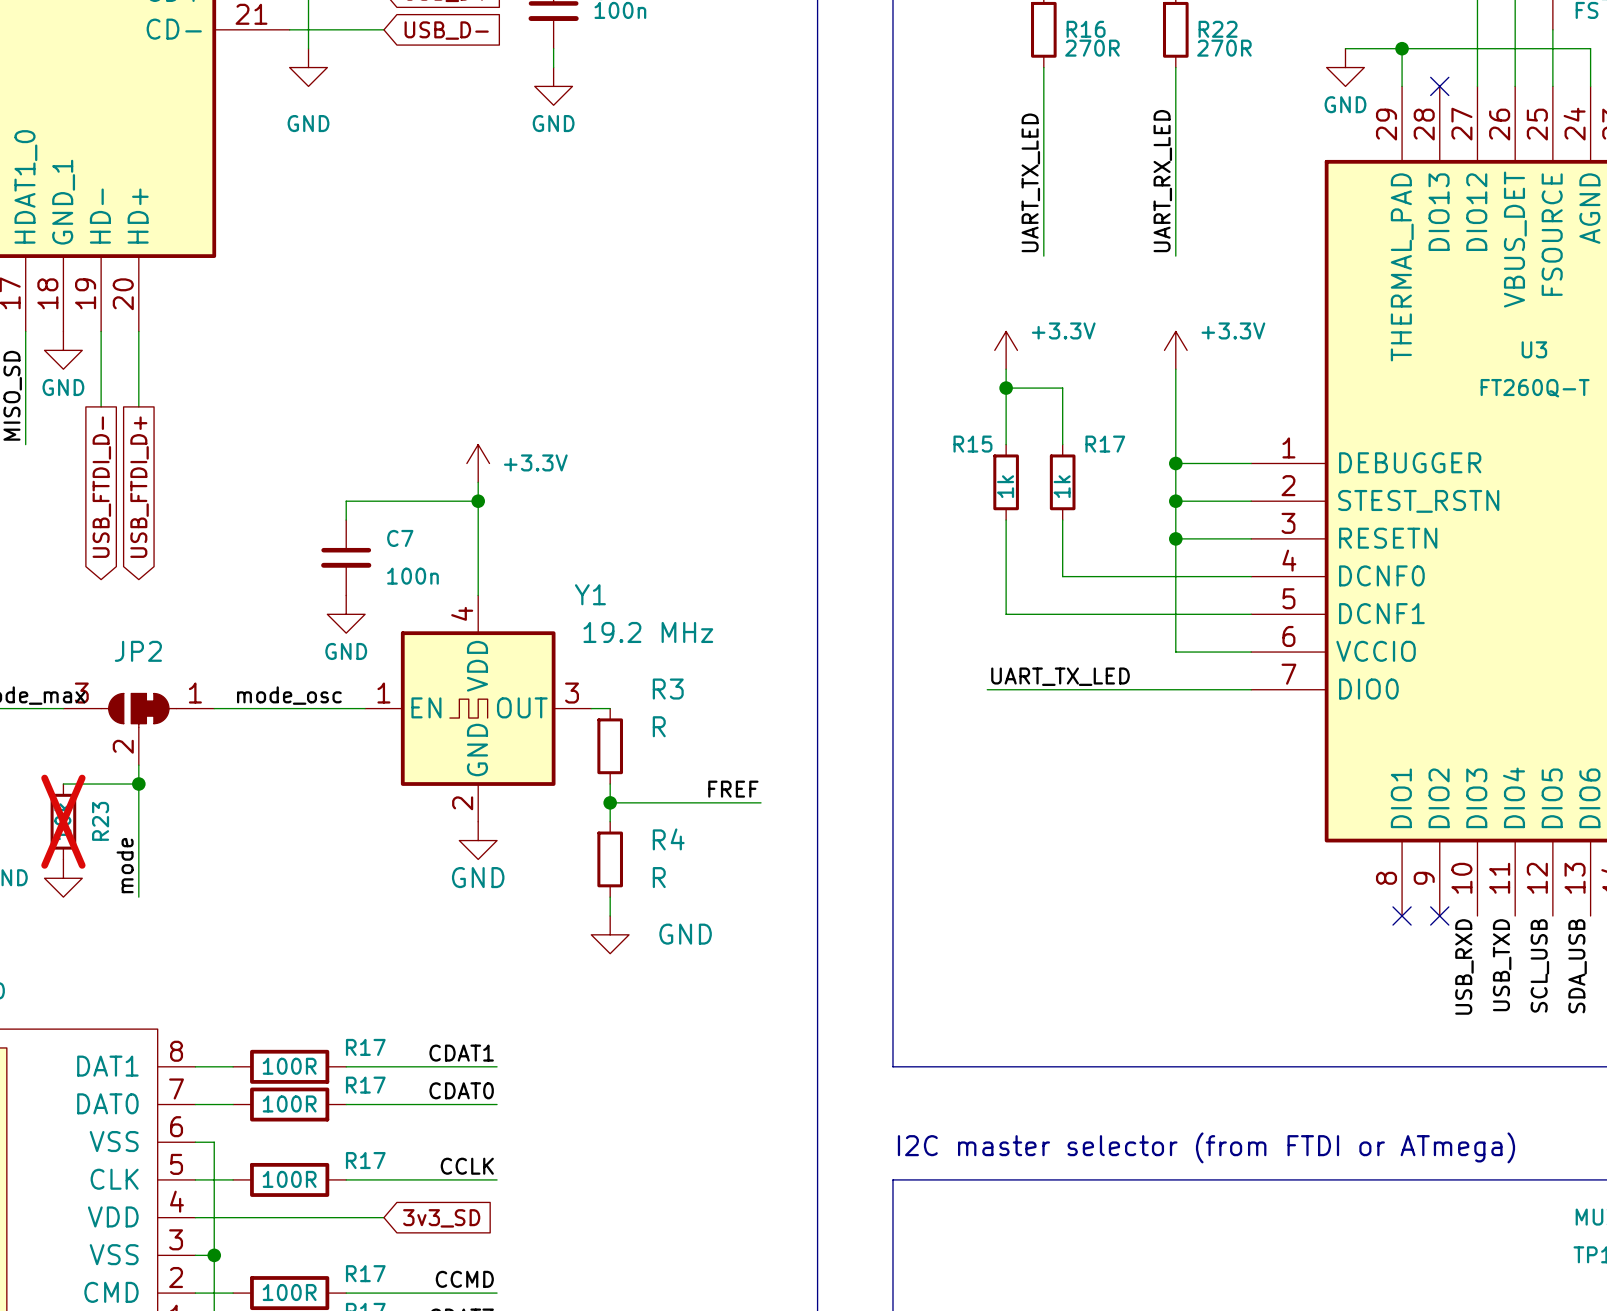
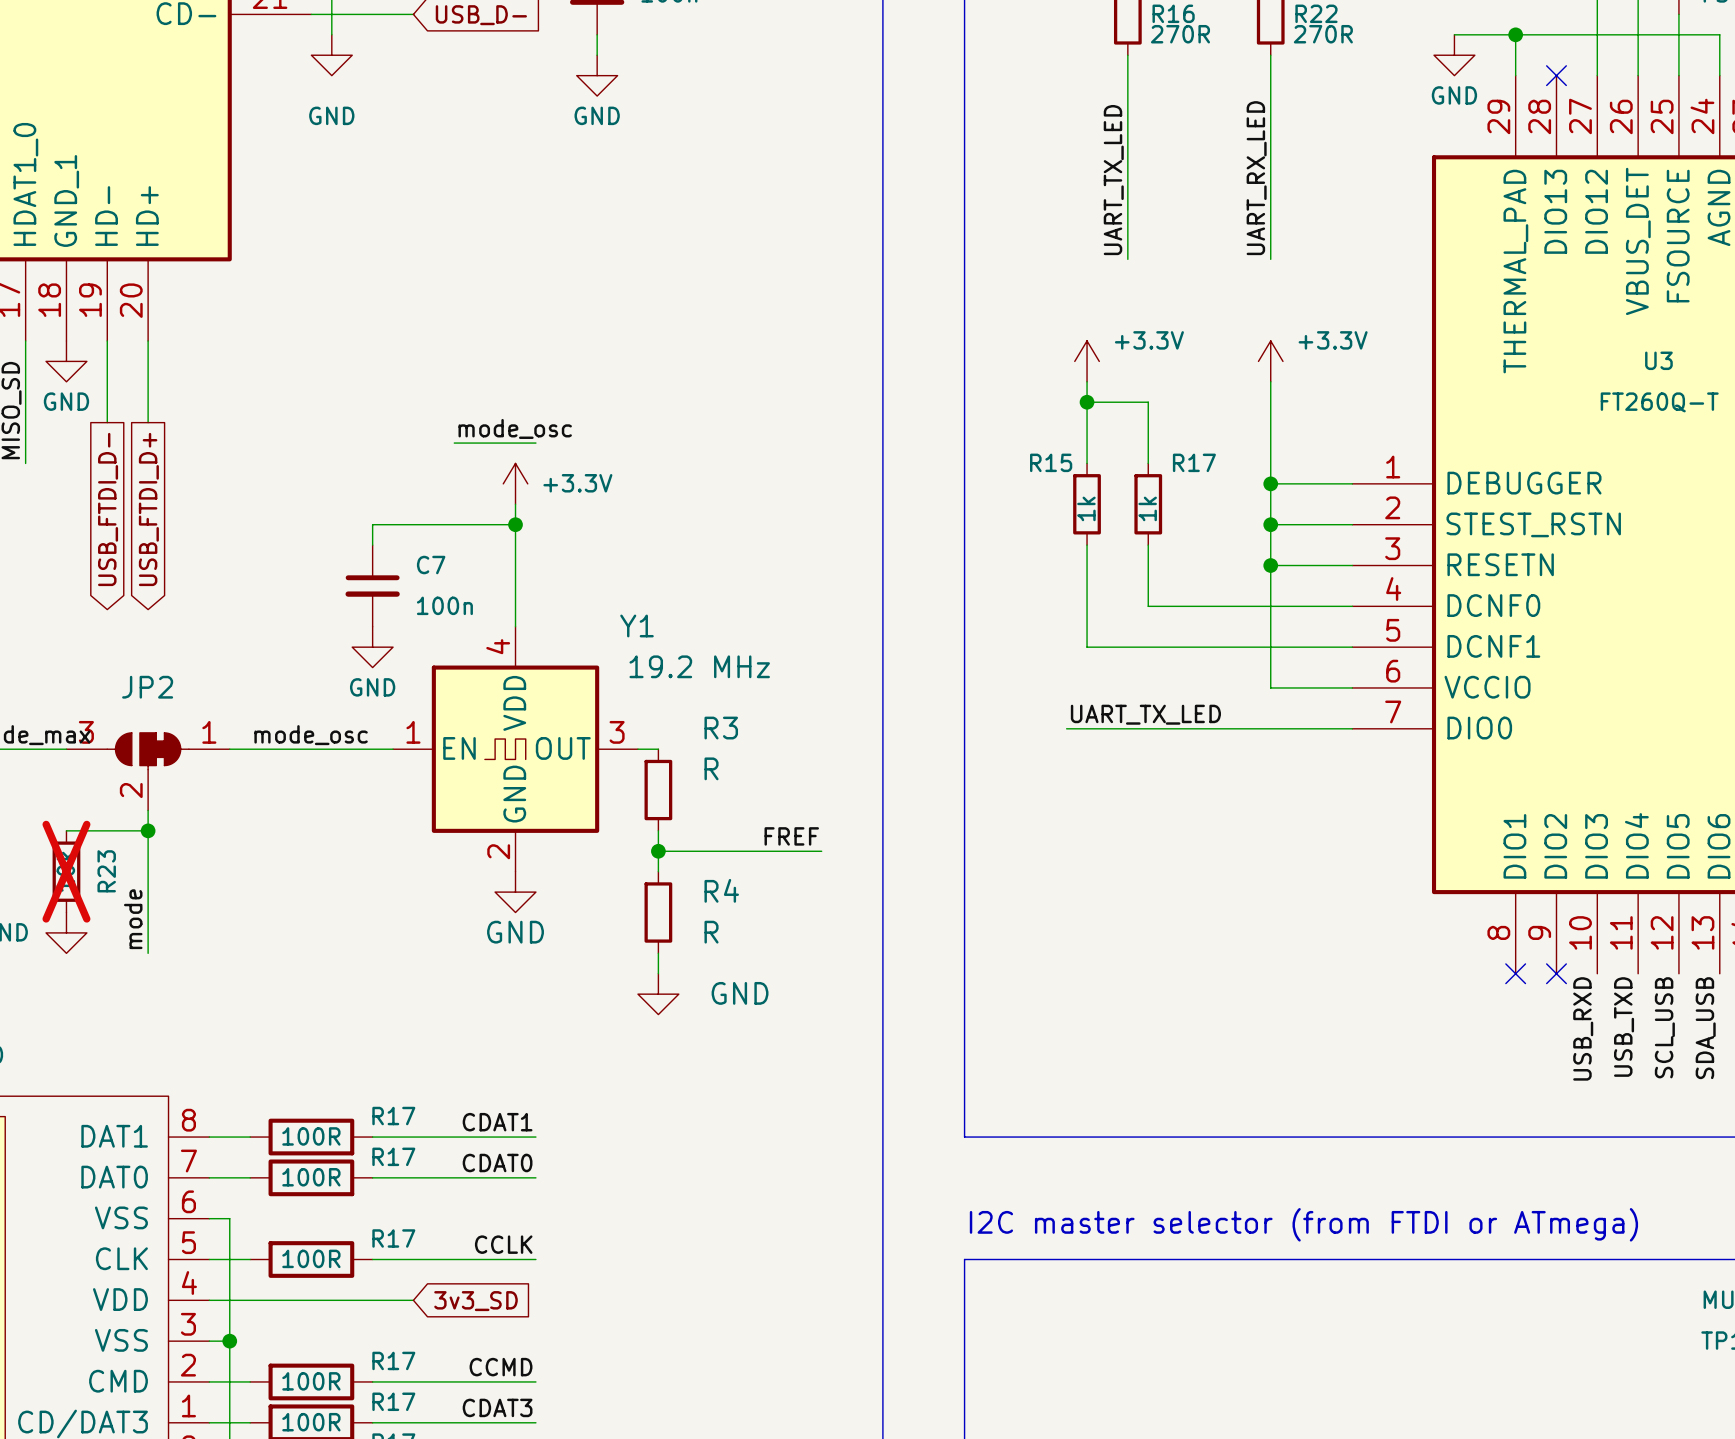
label: none -> mode_osc (515, 428)
wire: none -> (454, 443) (535, 443)

